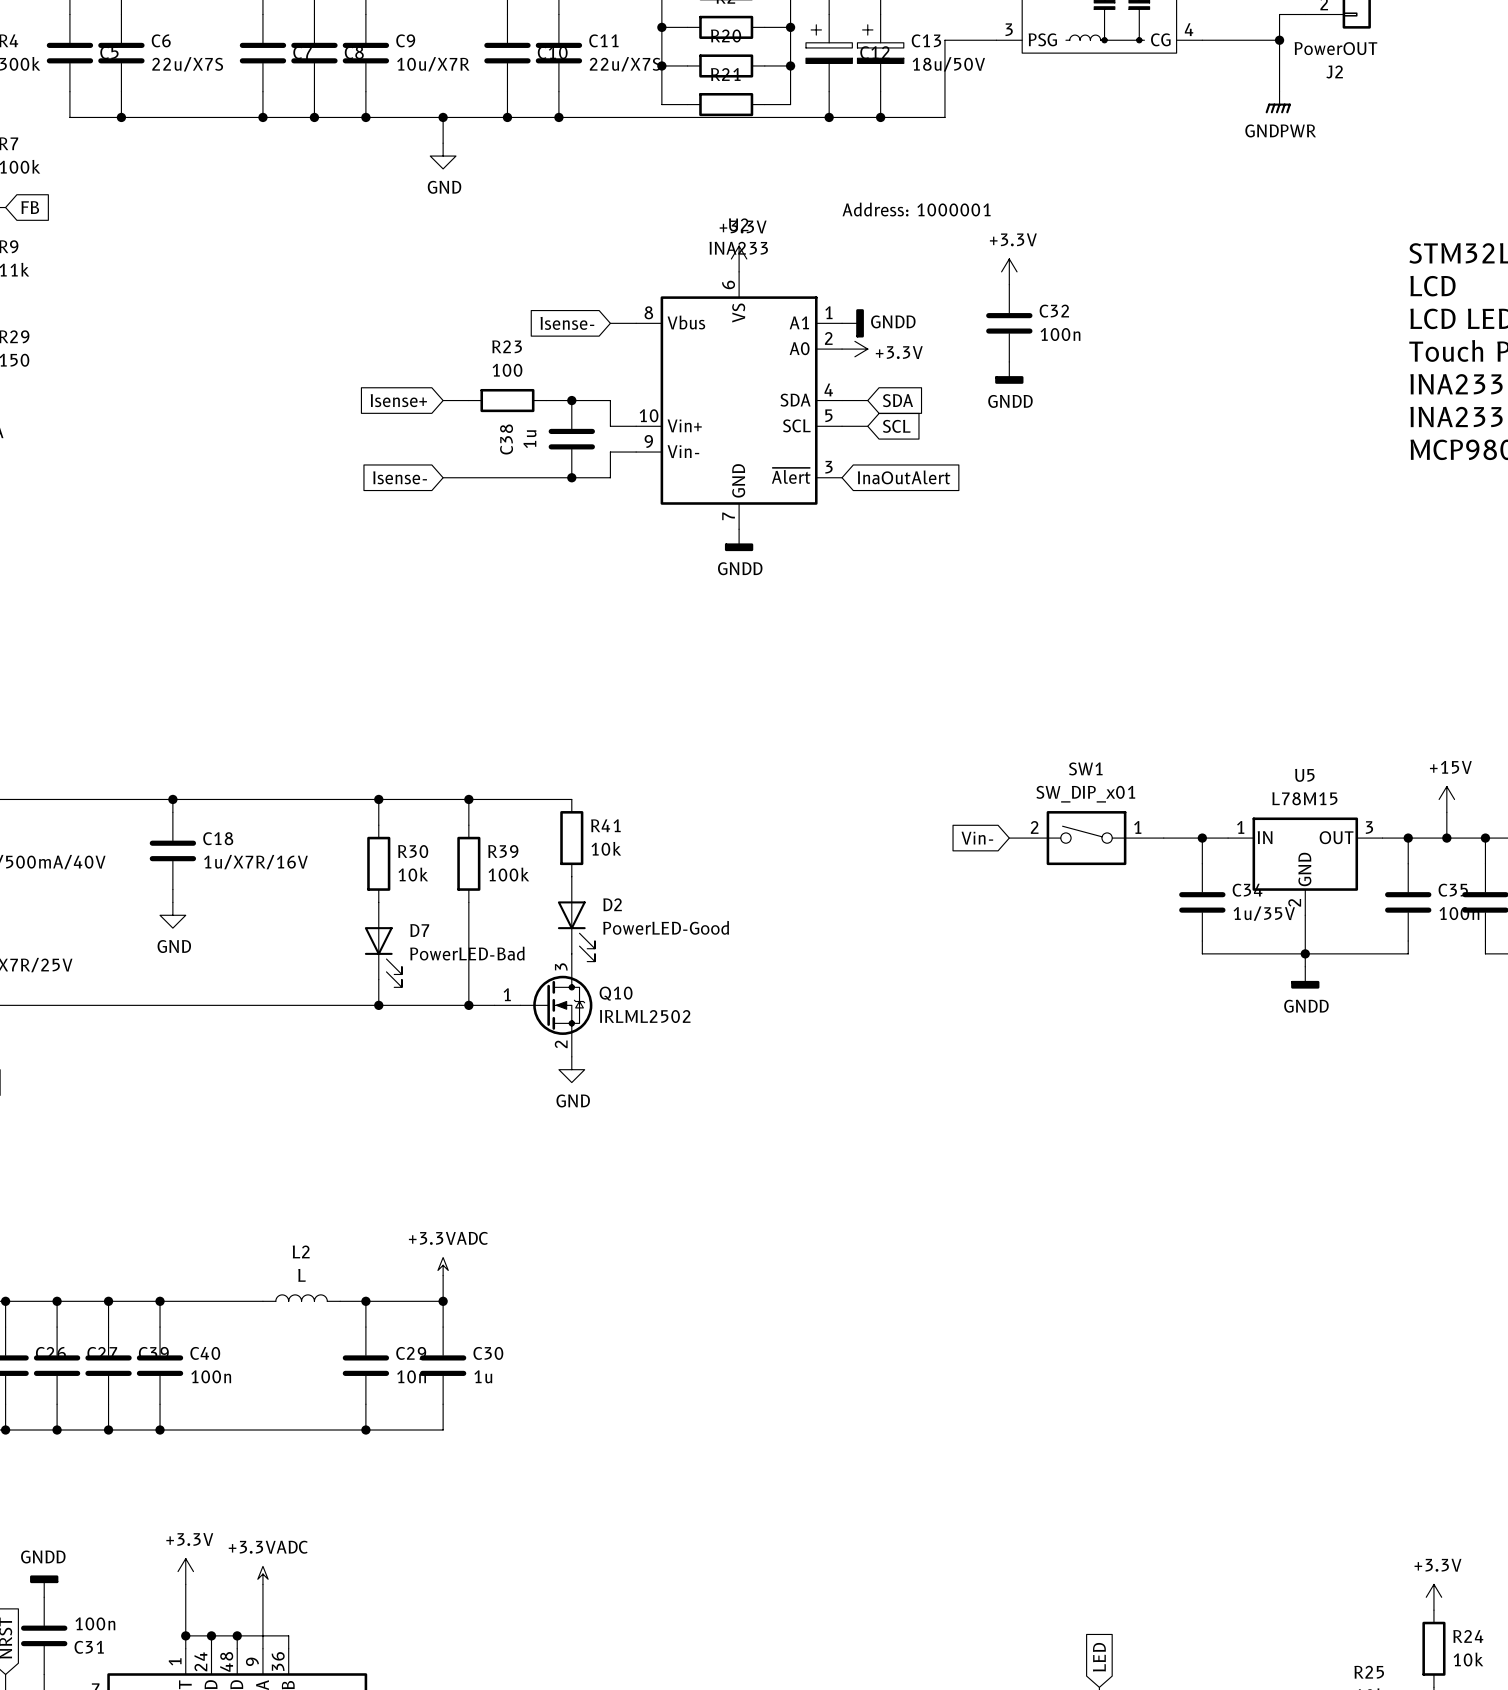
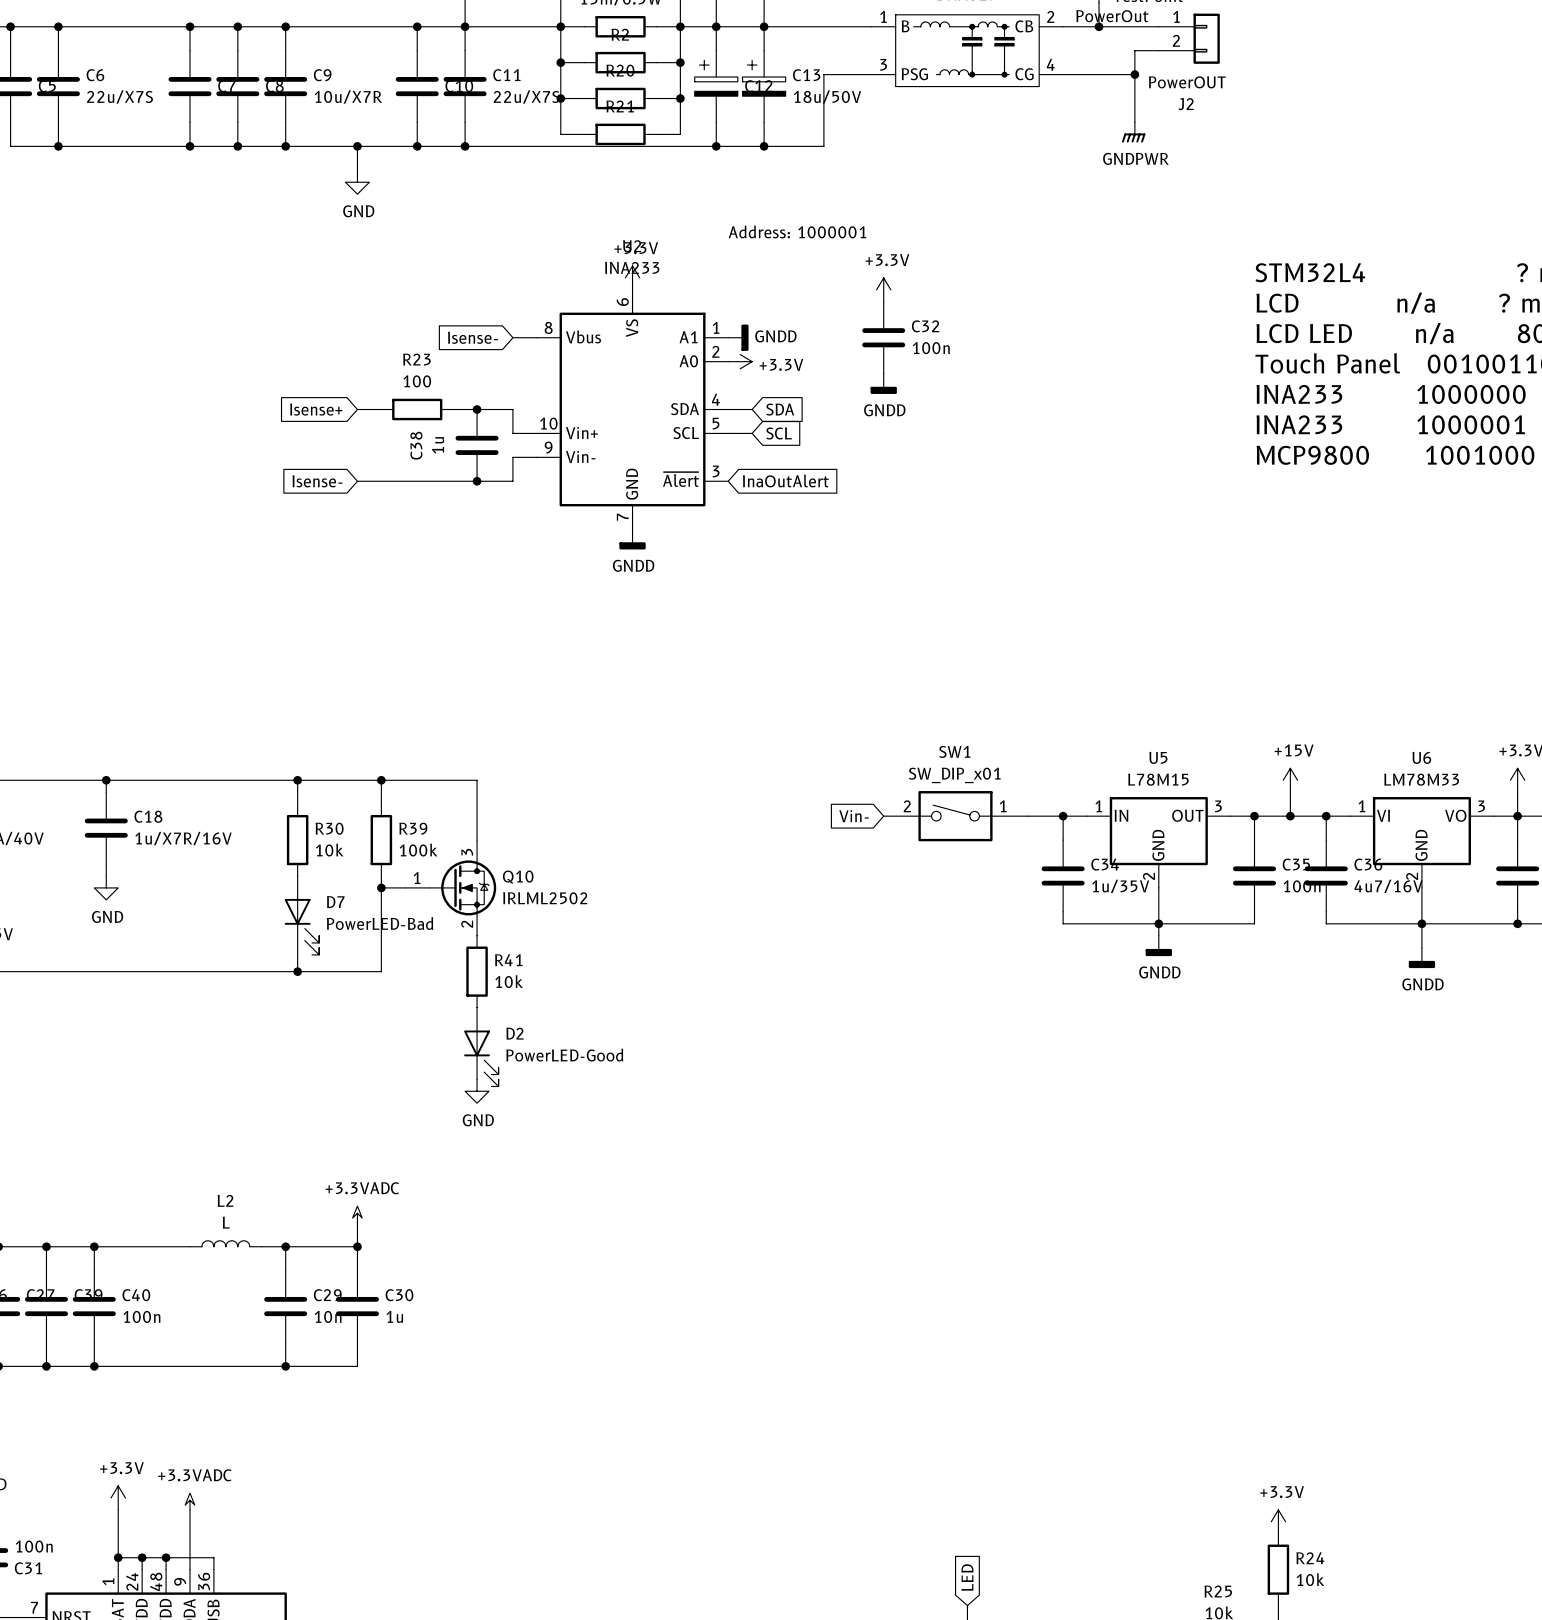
wire: none -> (477, 780) (477, 840)
R41 position: (571, 838) -> (477, 971)
junction: none -> (381, 887)
D2 position: (576, 919) -> (481, 1047)
wire: (468, 1005) (494, 1005) -> (381, 887) (405, 887)
junction: (468, 1005) -> none
Q10 position: (543, 1005) -> (450, 887)
power symbol position: GND (571, 1069) -> GND (477, 1091)

